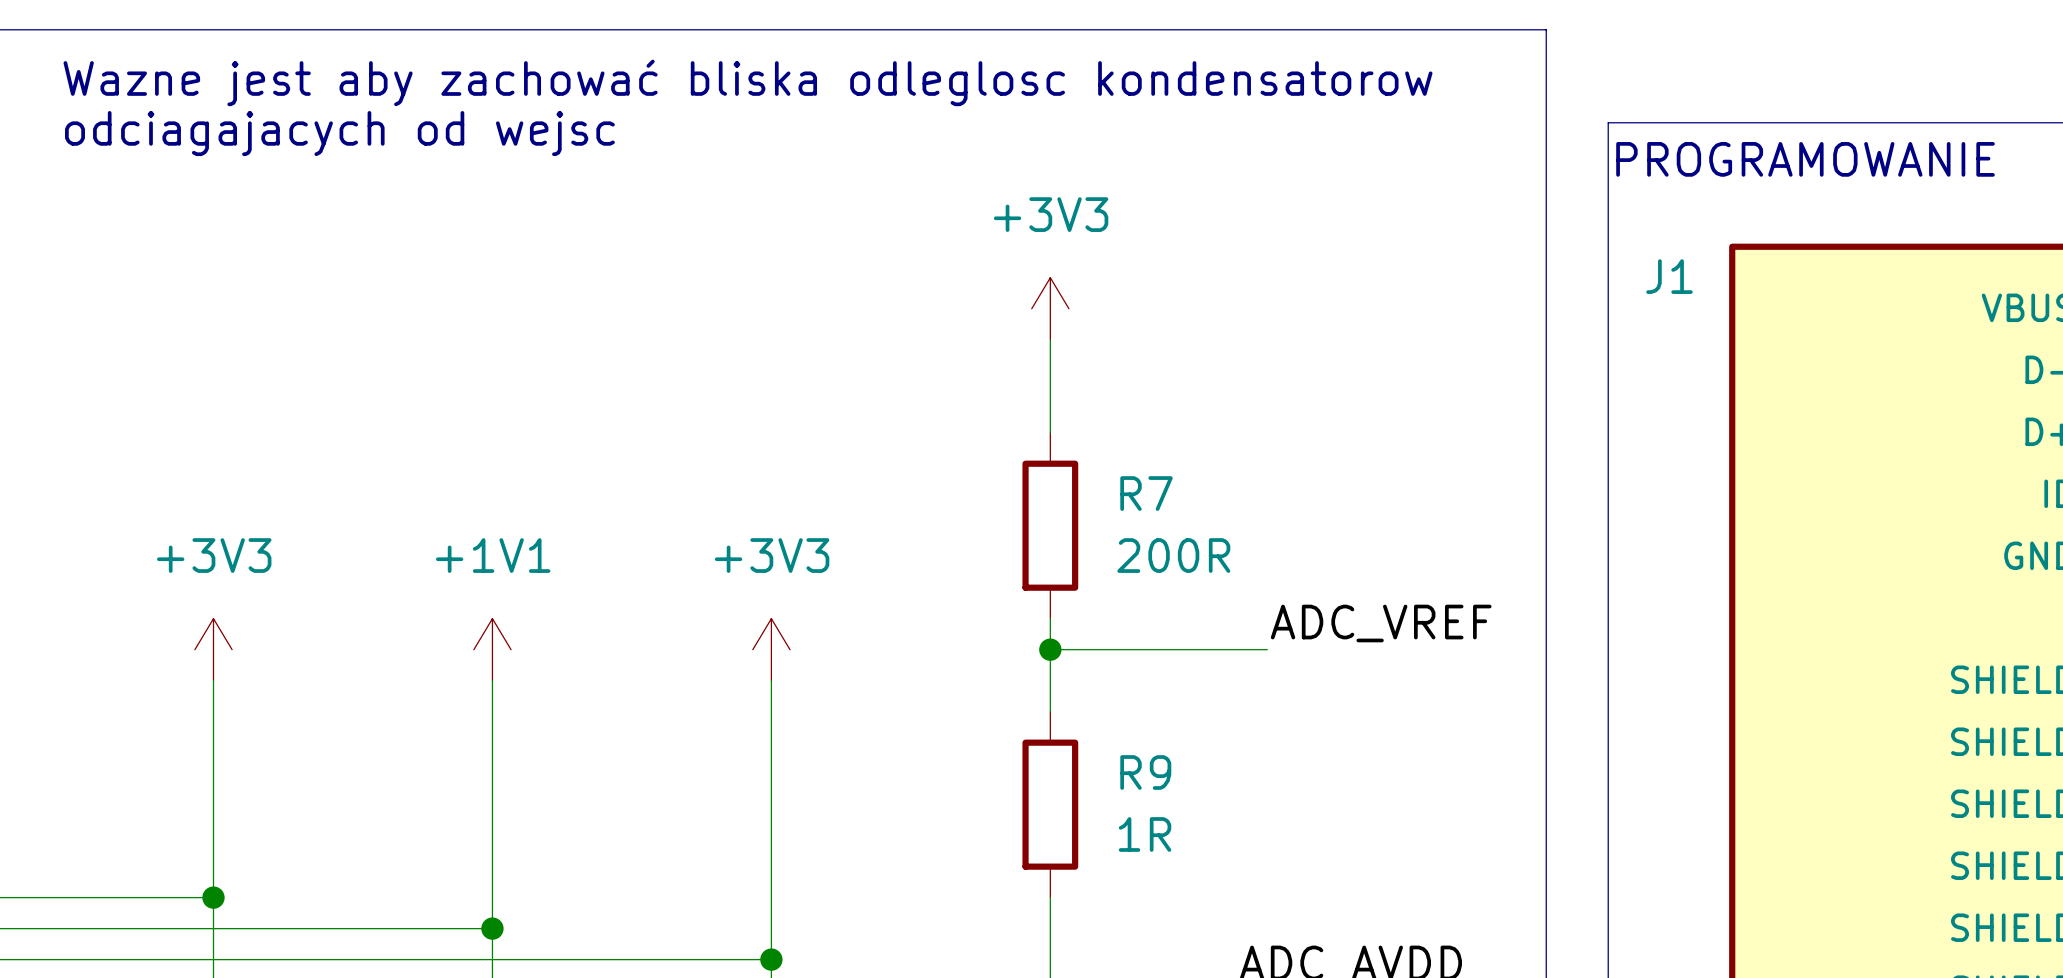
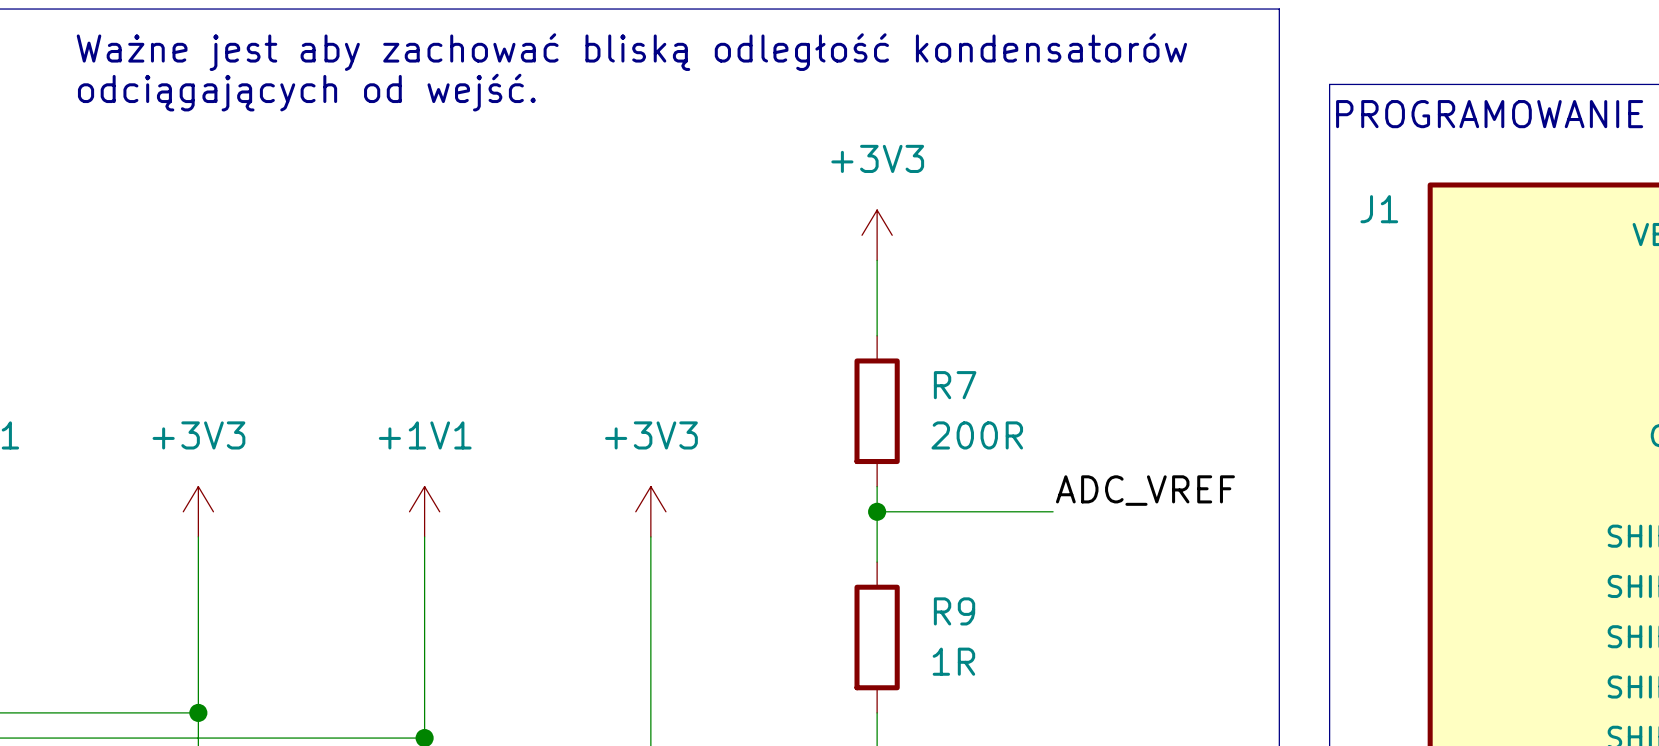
text: Wazne jest aby zachować bliska odleglosc kondensatorow (748, 82) -> Ważne jest aby zachować bliską odległość kondensatorów (631, 52)
text: odciagajacych od wejsc (339, 133) -> odciągających od wejść. (306, 92)

